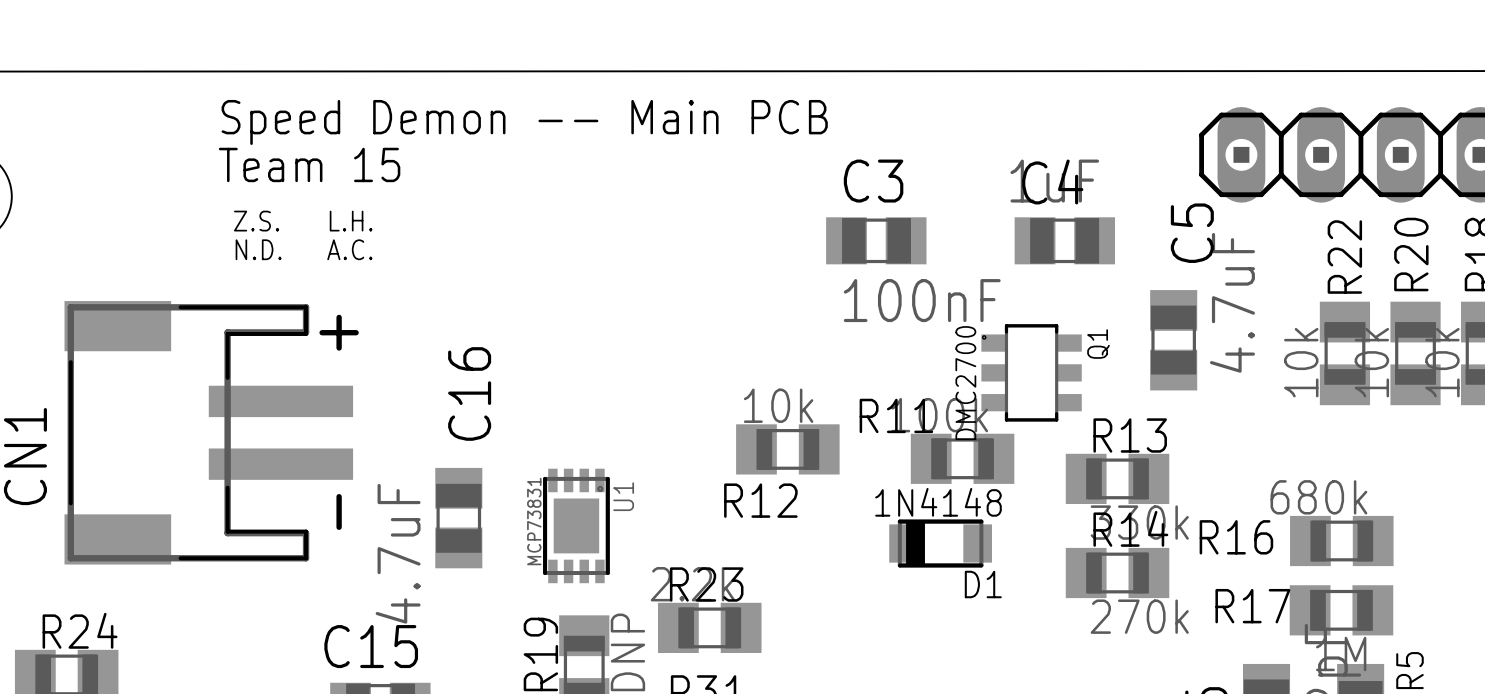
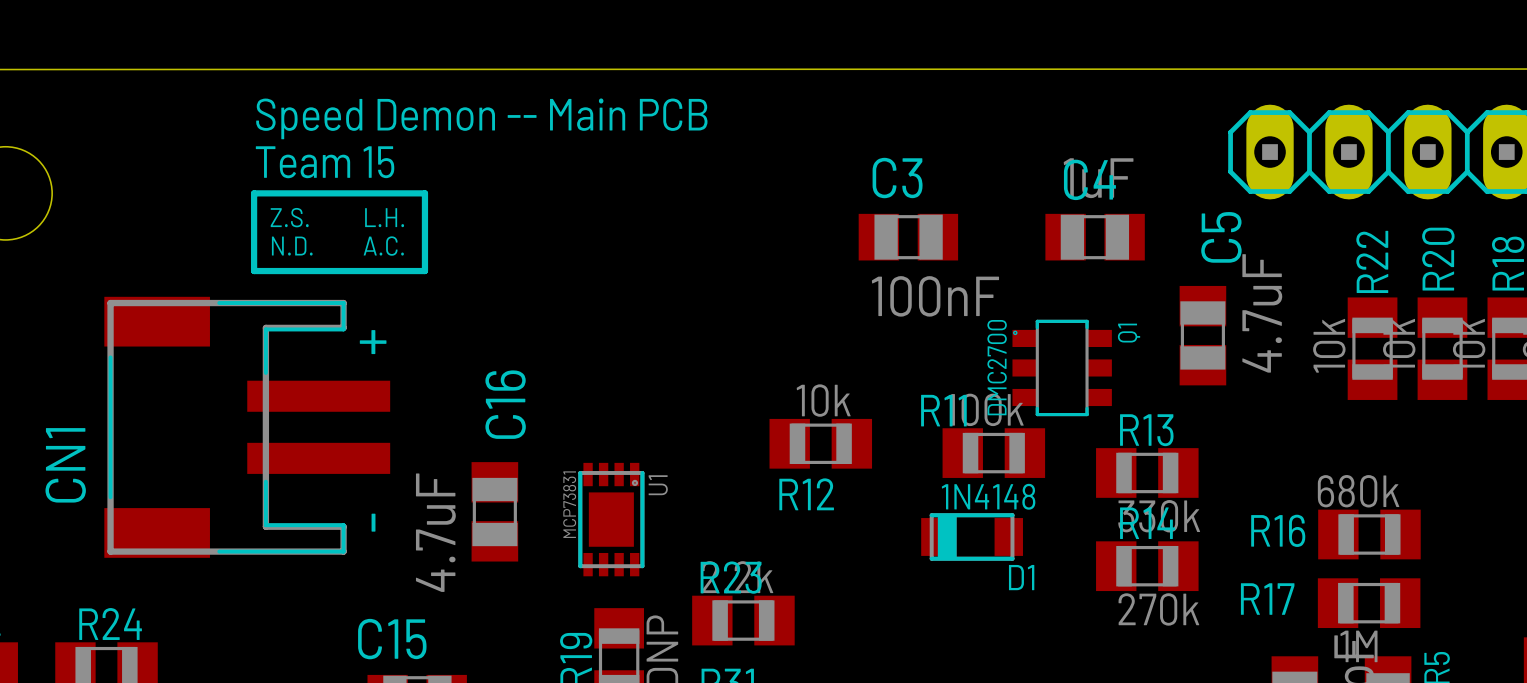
line: none -> (254, 193) (424, 193) (424, 271) (254, 271) (254, 193)

